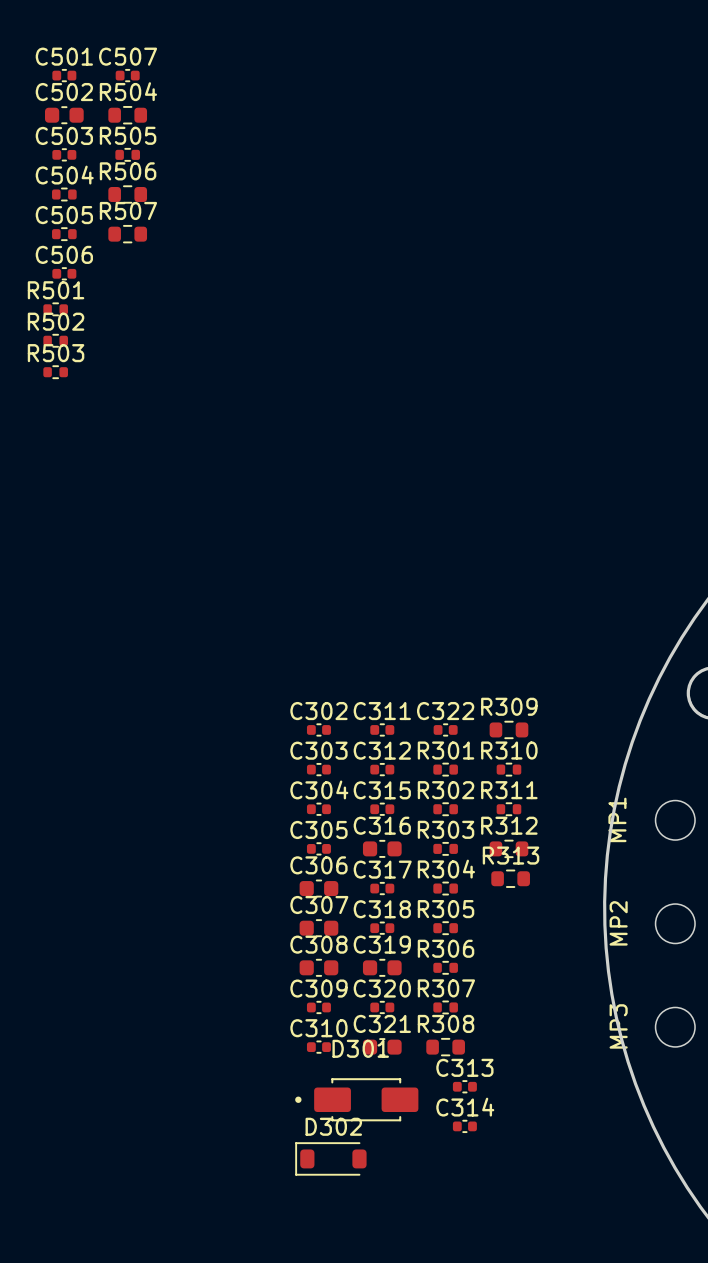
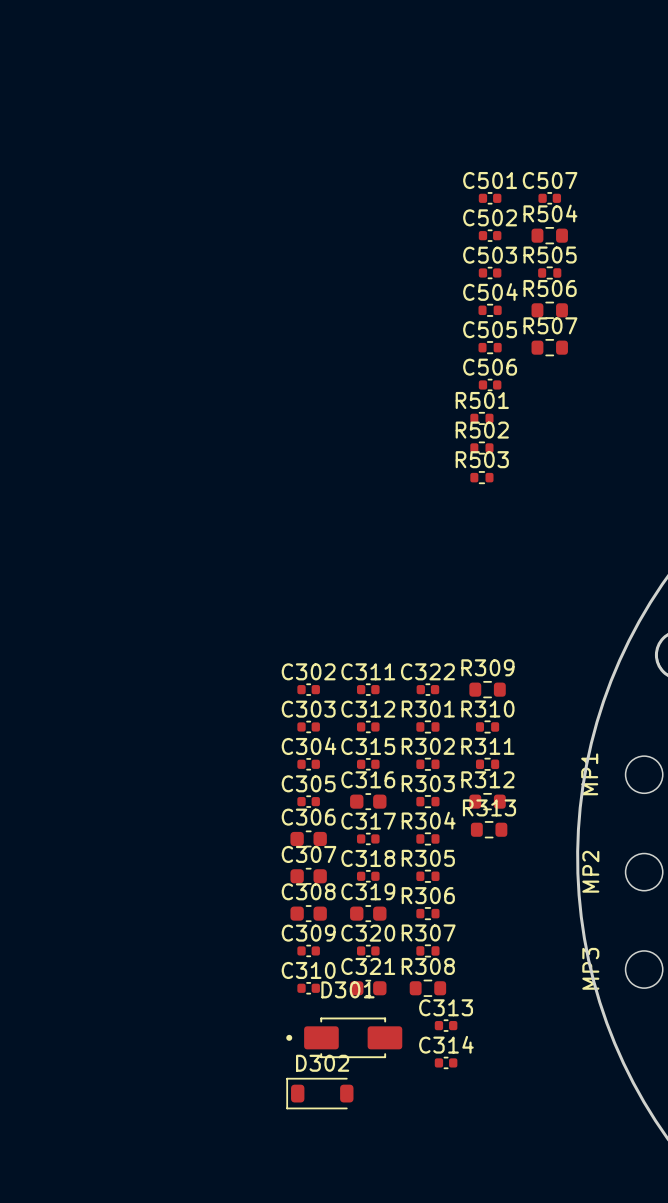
C501 position: (64, 75) -> (490, 198)
C507 position: (127, 75) -> (549, 198)
C502 footprint: [44, 106, 84, 125] -> [478, 229, 502, 242]
R504 position: (127, 115) -> (549, 235)
C503 position: (64, 154) -> (490, 272)
R505 position: (127, 154) -> (549, 272)
C504 position: (64, 194) -> (490, 310)
R506 position: (127, 194) -> (549, 310)
C505 position: (64, 234) -> (490, 347)
R507 position: (127, 234) -> (549, 347)
C506 position: (64, 273) -> (490, 384)
R501 position: (55, 309) -> (481, 418)
R502 position: (55, 340) -> (481, 448)
R503 position: (55, 372) -> (481, 477)

